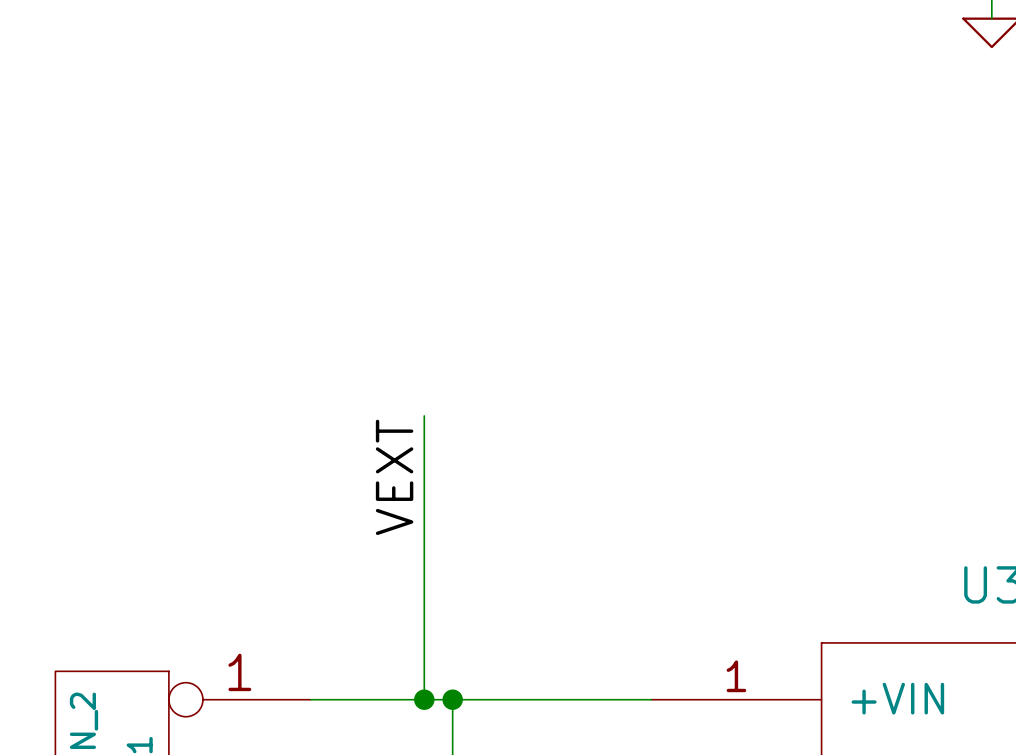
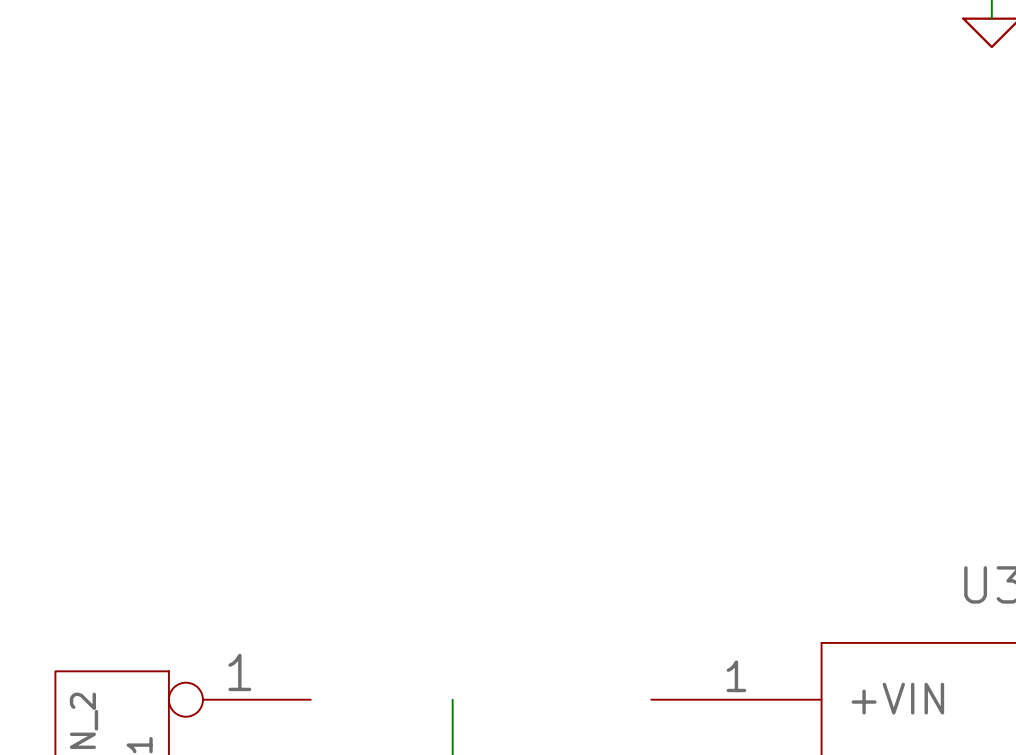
wire: (424, 415) (424, 699) -> none
label: VEXT (394, 477) -> none
wire: (310, 699) (651, 699) -> none
junction: (424, 699) -> none
junction: (452, 699) -> none

